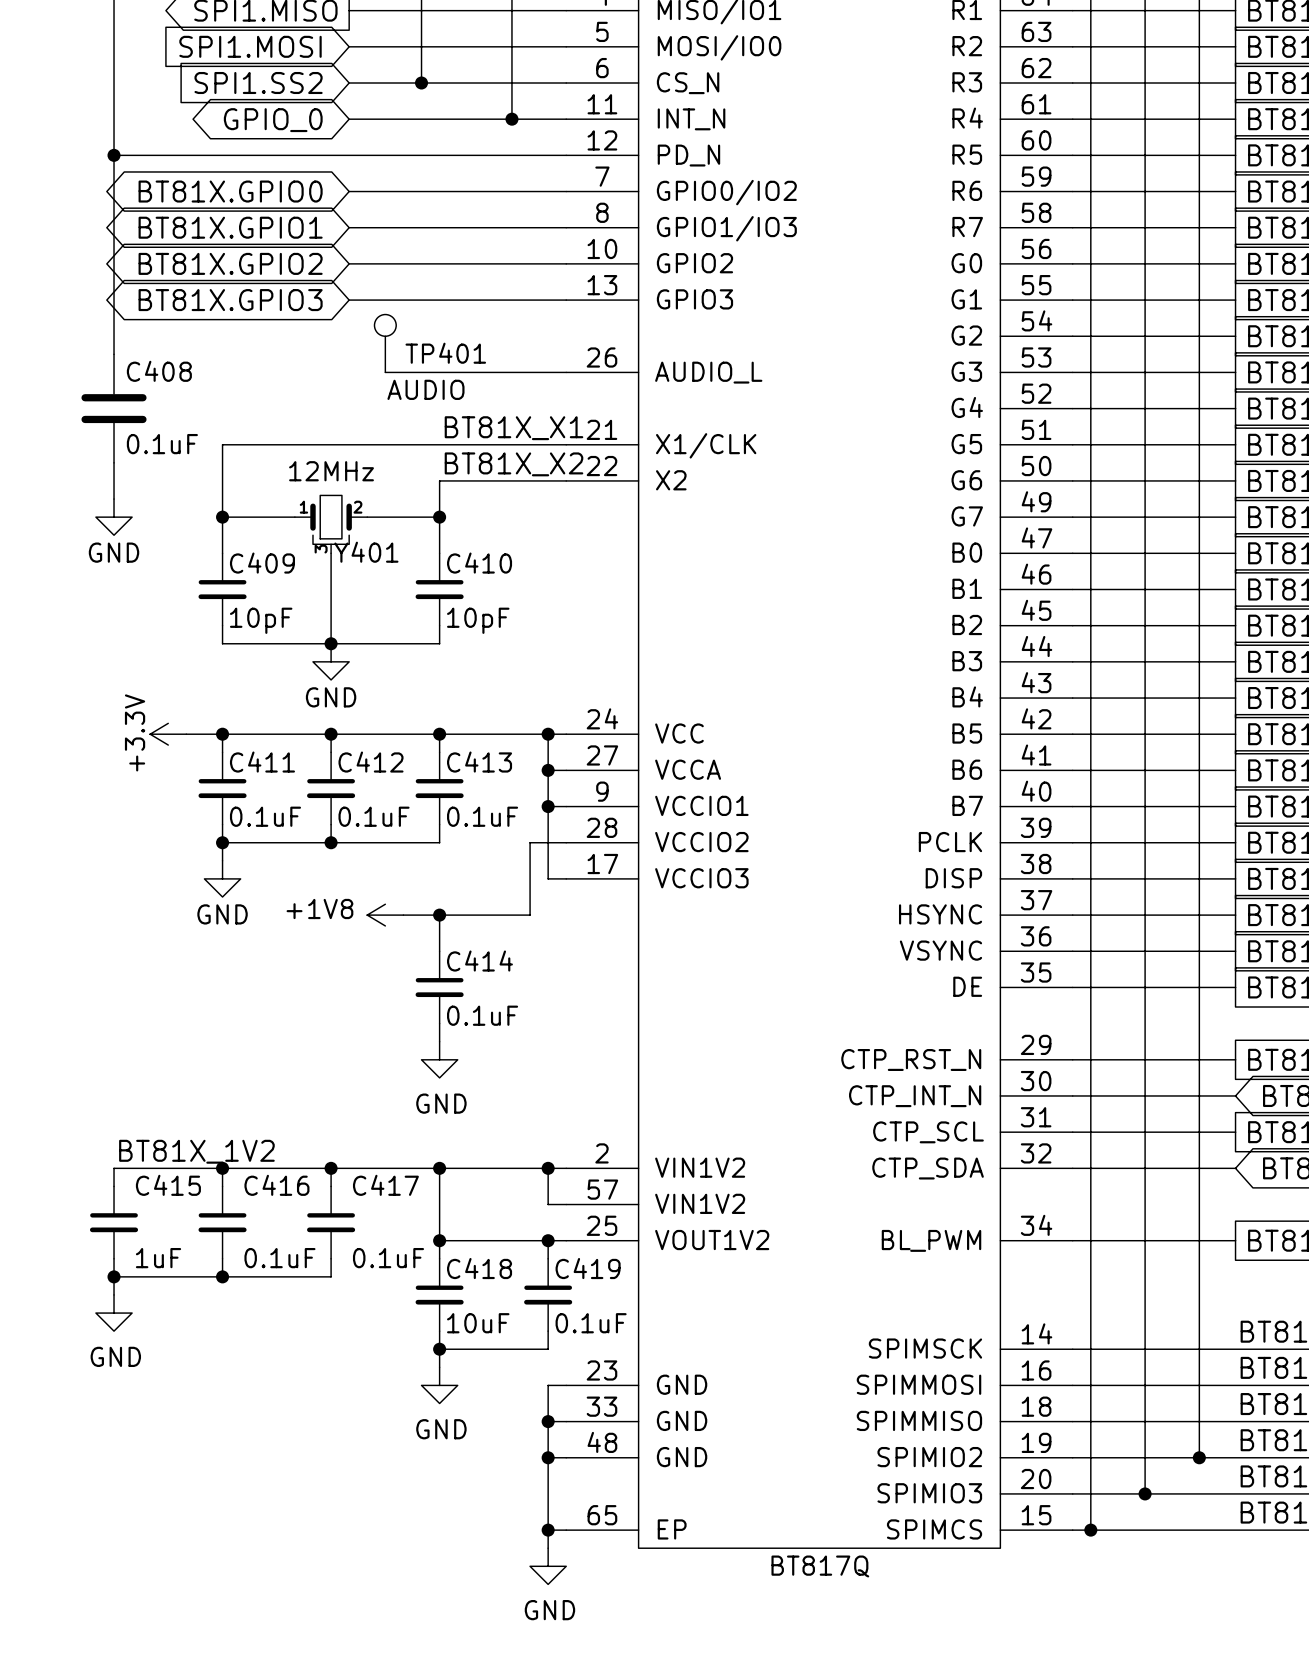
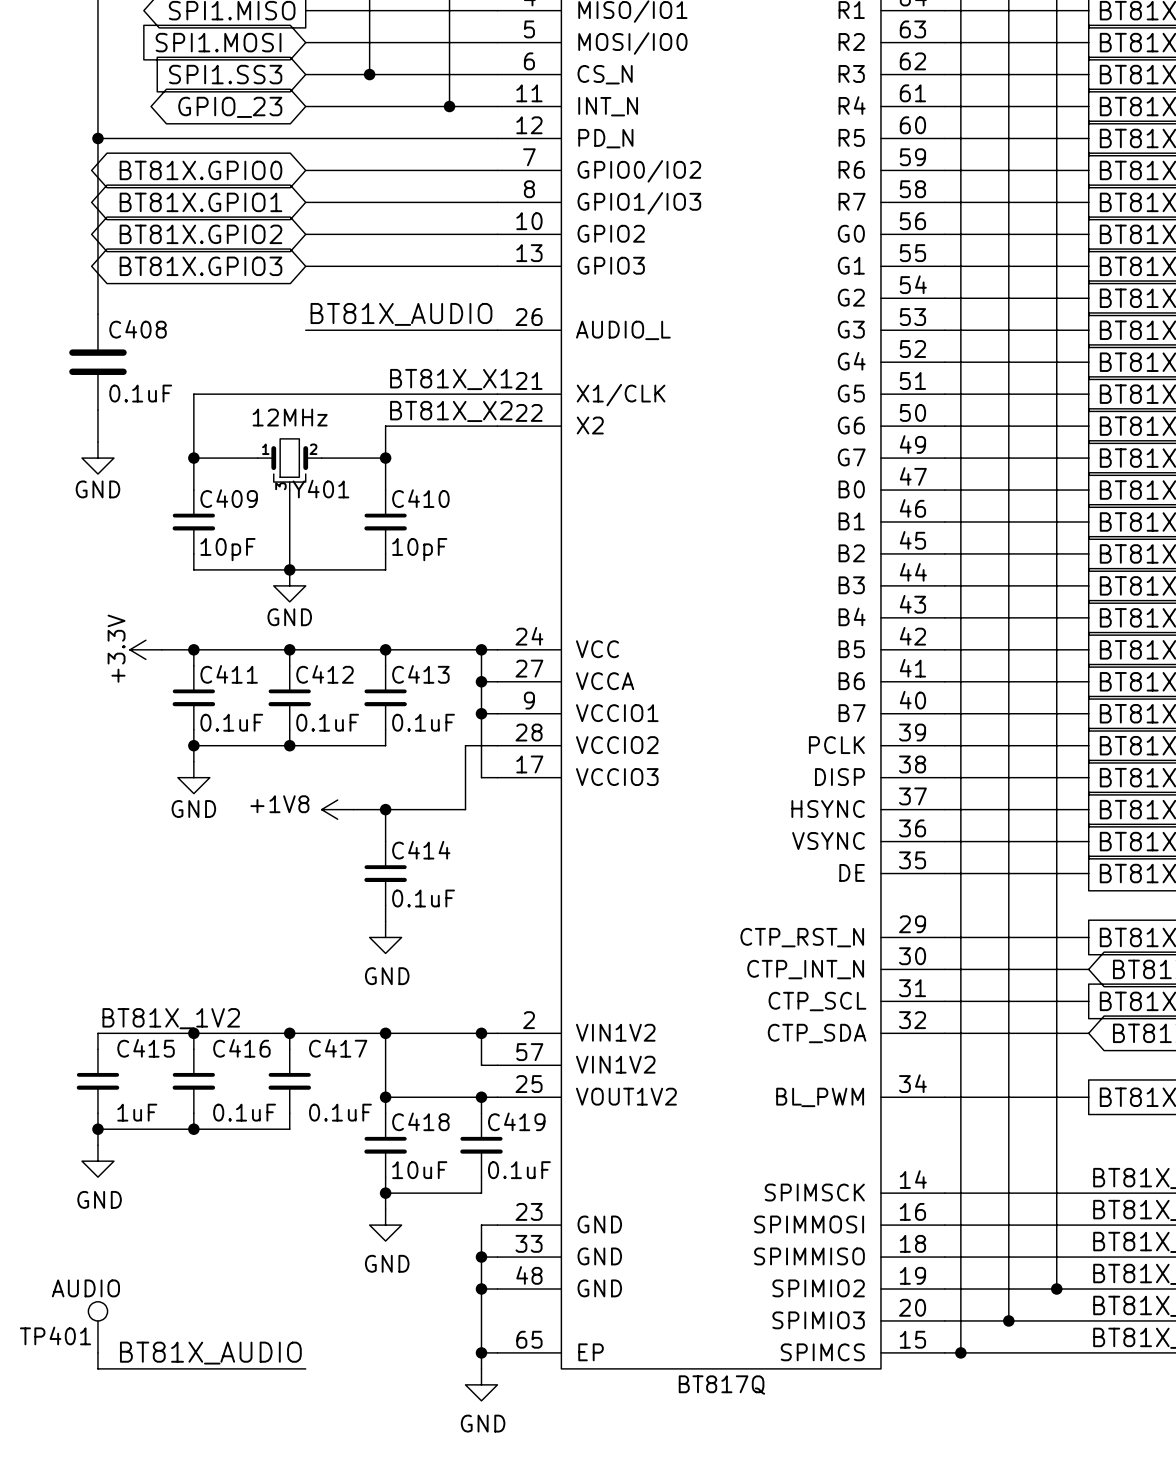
global label: SPI1.SS2 (258, 83) -> SPI1.SS3 (225, 74)
global label: GPIO_0 (273, 120) -> GPIO_23 (230, 107)
TP401 position: (385, 343) -> (97, 1327)
TP401 name position: TP401 (445, 353) -> TP401 (55, 1335)
label: none -> BT81X_AUDIO (401, 314)
wire: none -> (305, 330) (337, 330)
TP401 value position: AUDIO (425, 389) -> AUDIO (85, 1288)
wire: none -> (97, 1352) (97, 1368) (305, 1368)
label: none -> BT81X_AUDIO (210, 1353)

